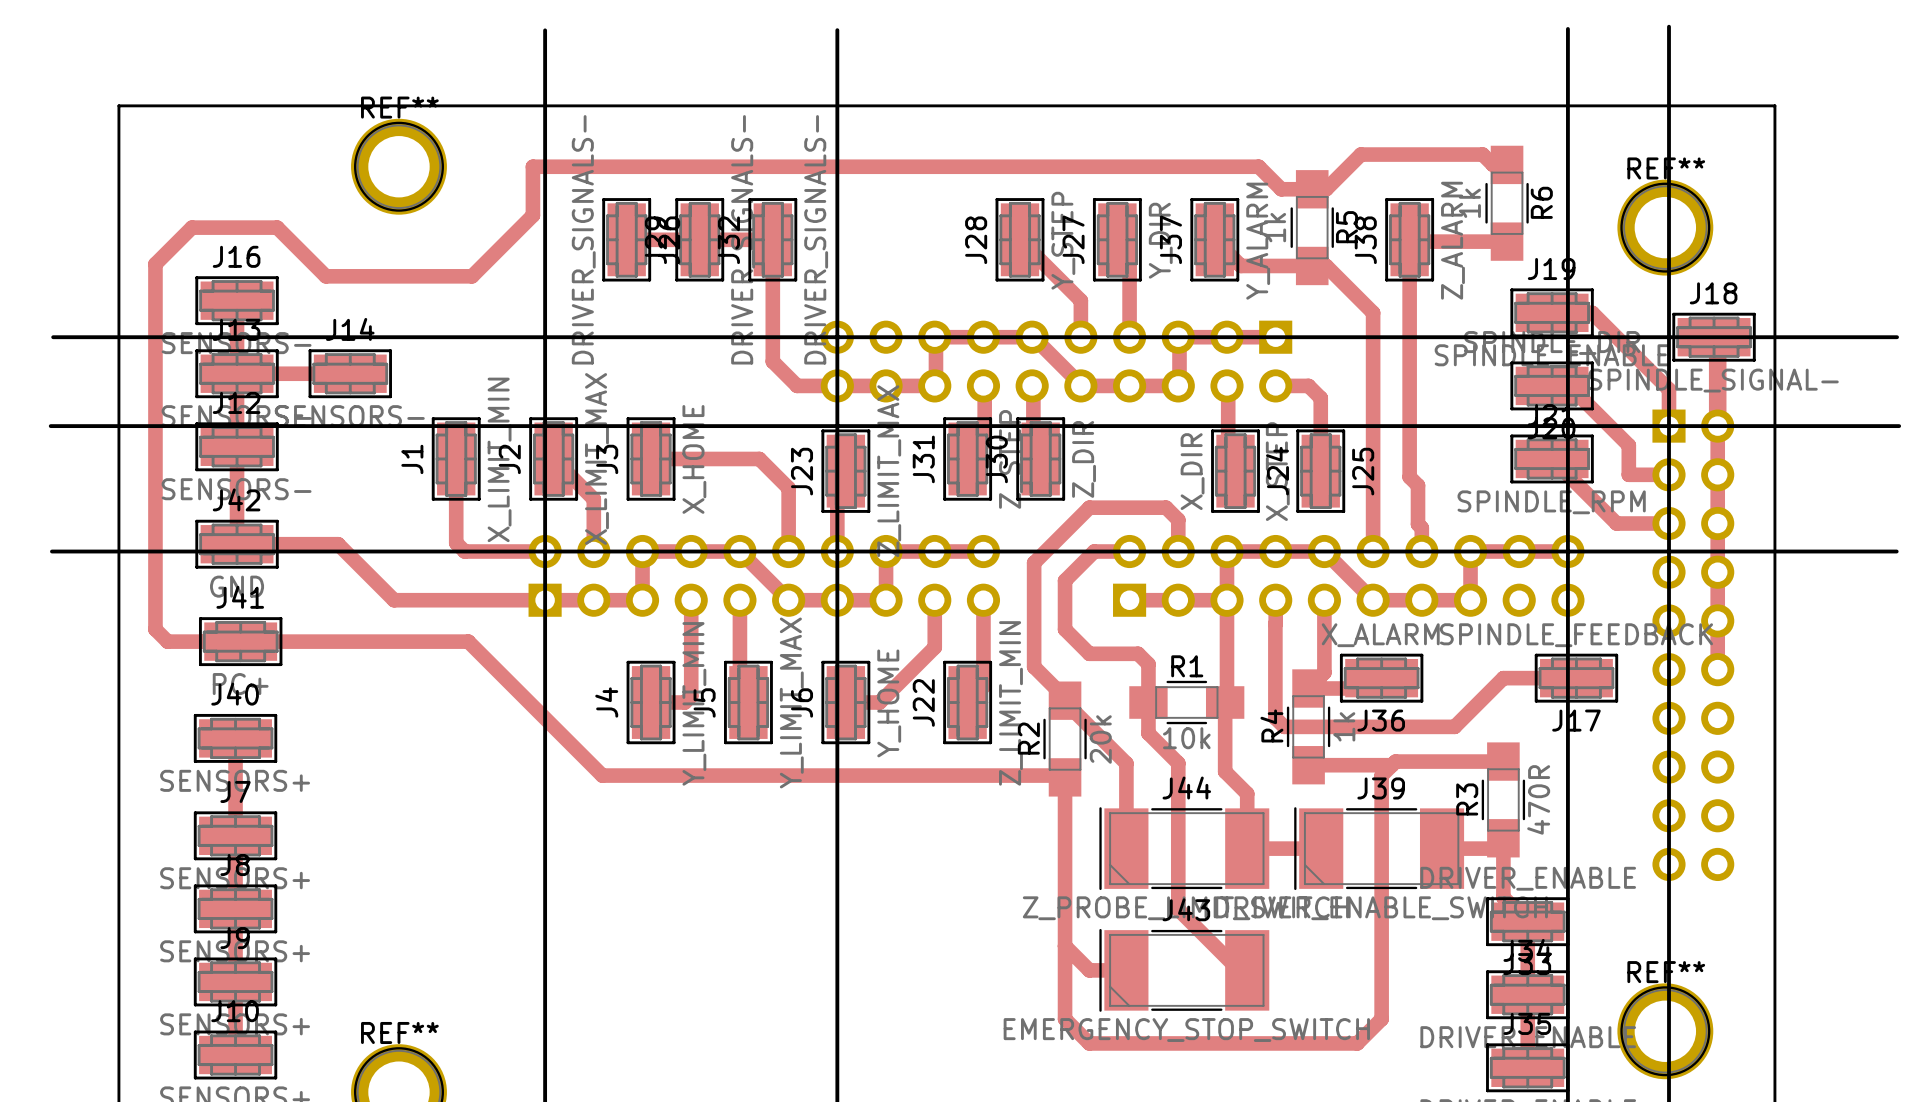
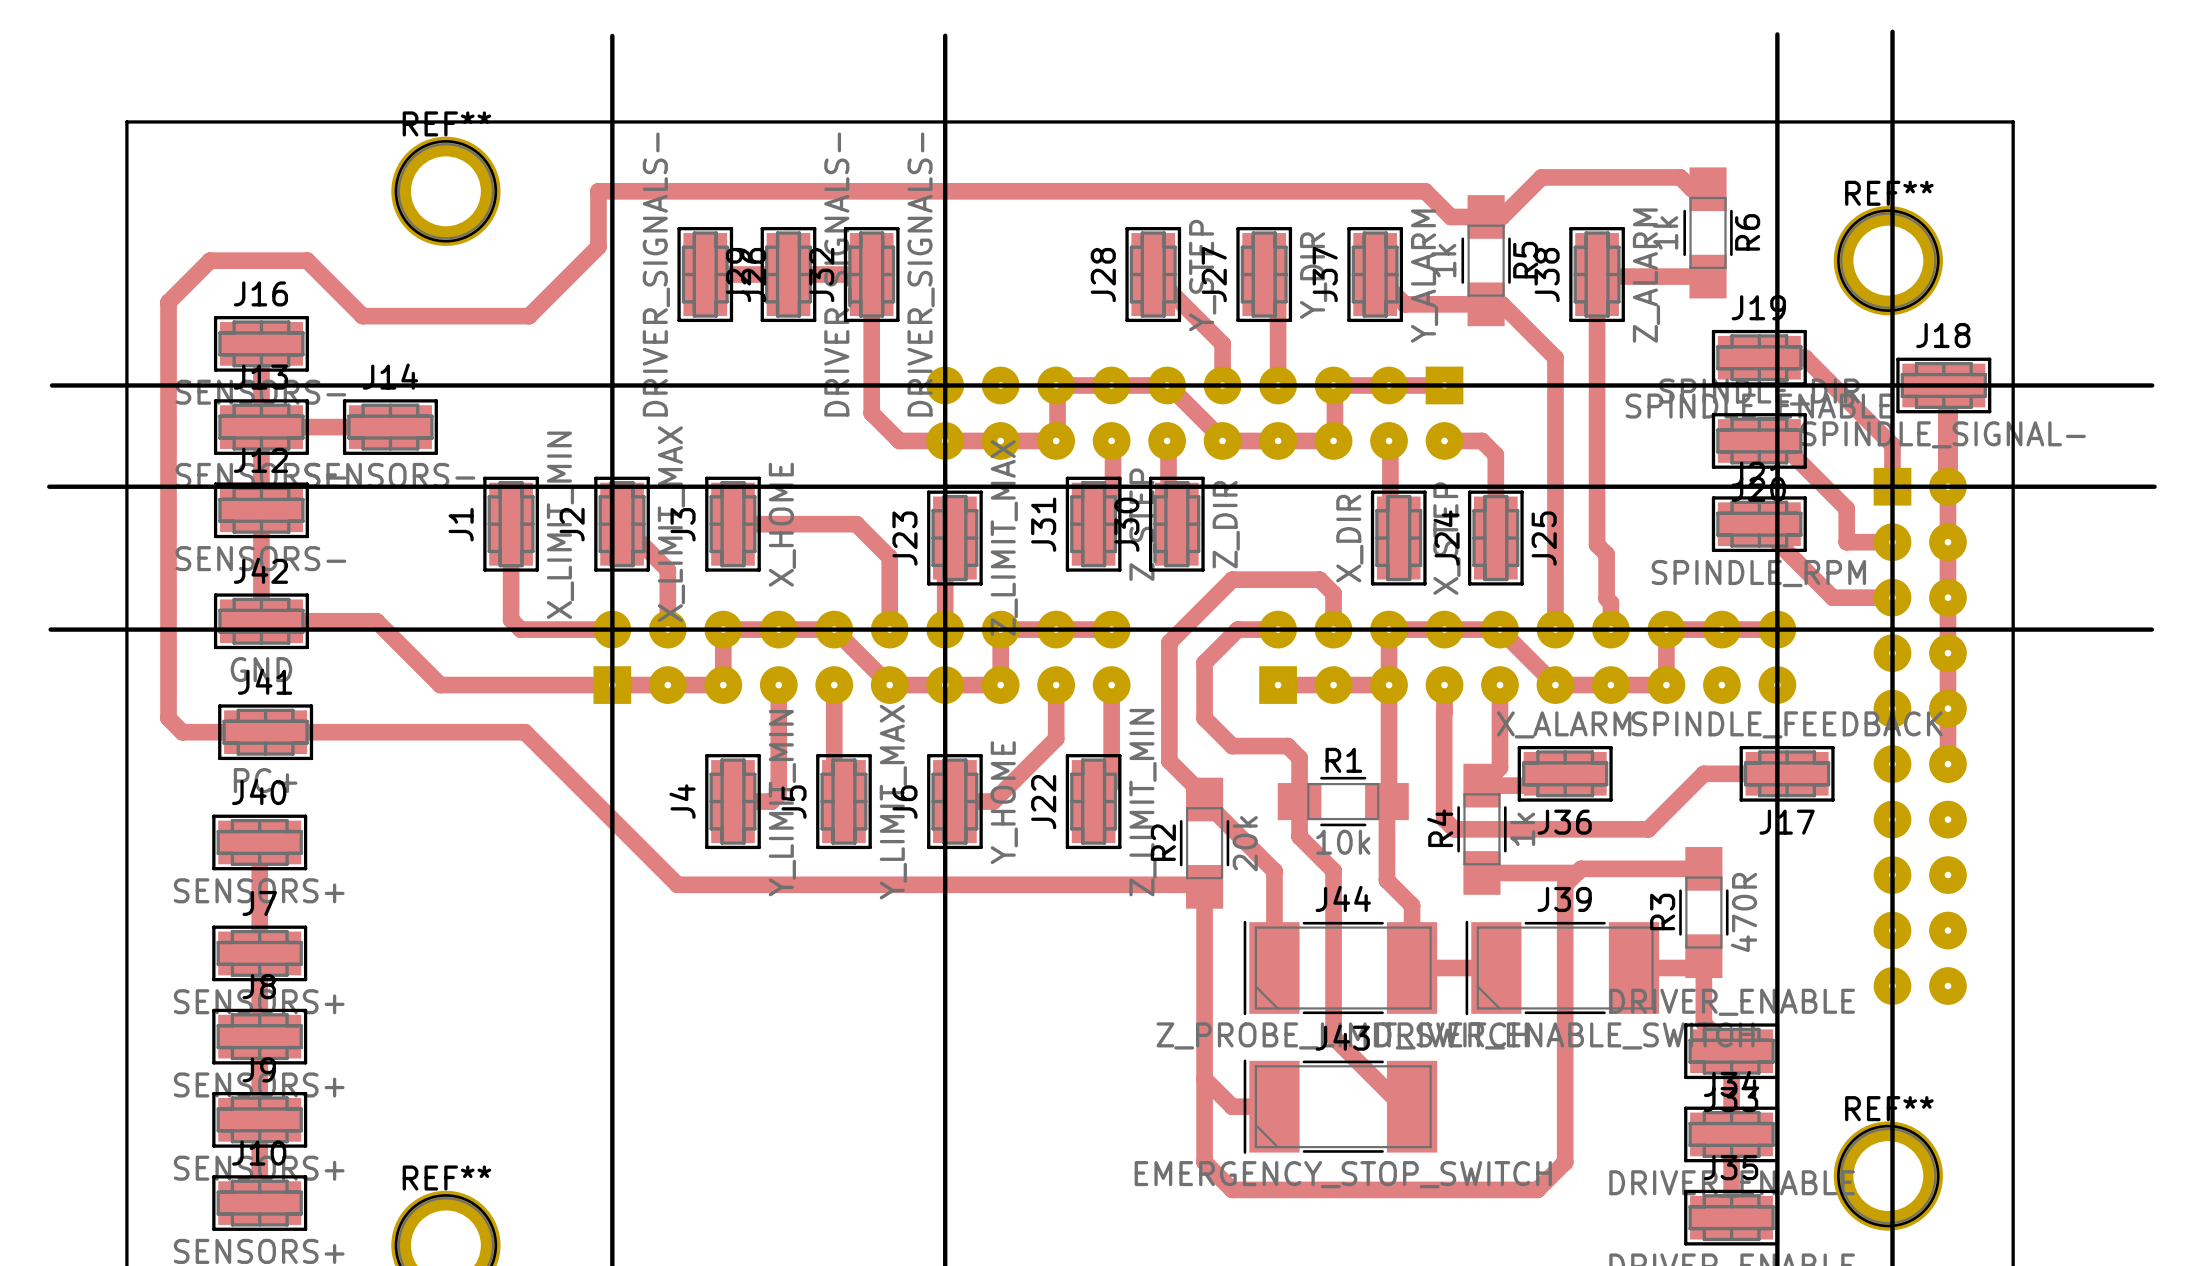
part footprint: [820, 320, 1293, 403] -> [926, 366, 1464, 460]
part footprint: [1652, 409, 1735, 882] -> [1873, 467, 1967, 1005]
part footprint: [528, 534, 1001, 617] -> [593, 610, 1131, 704]
part footprint: [1113, 534, 1585, 617] -> [1259, 610, 1797, 704]

